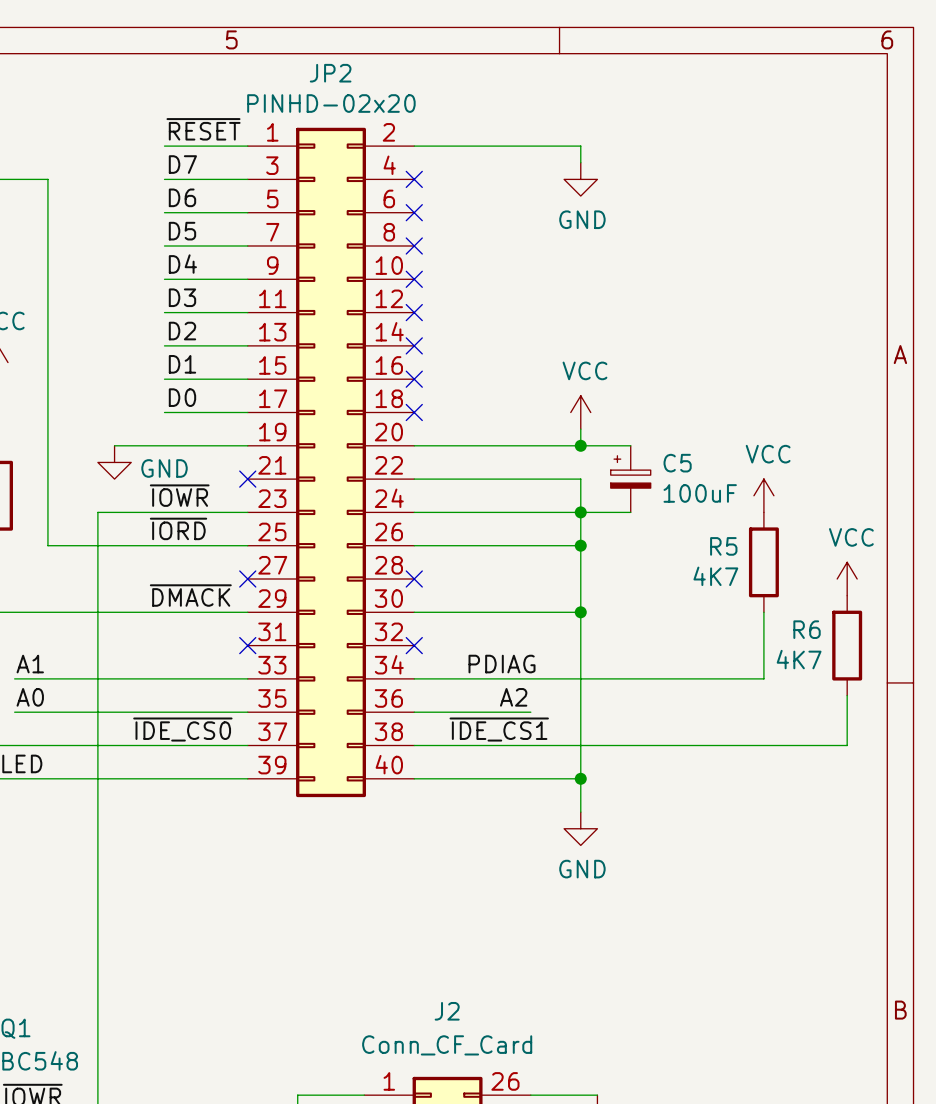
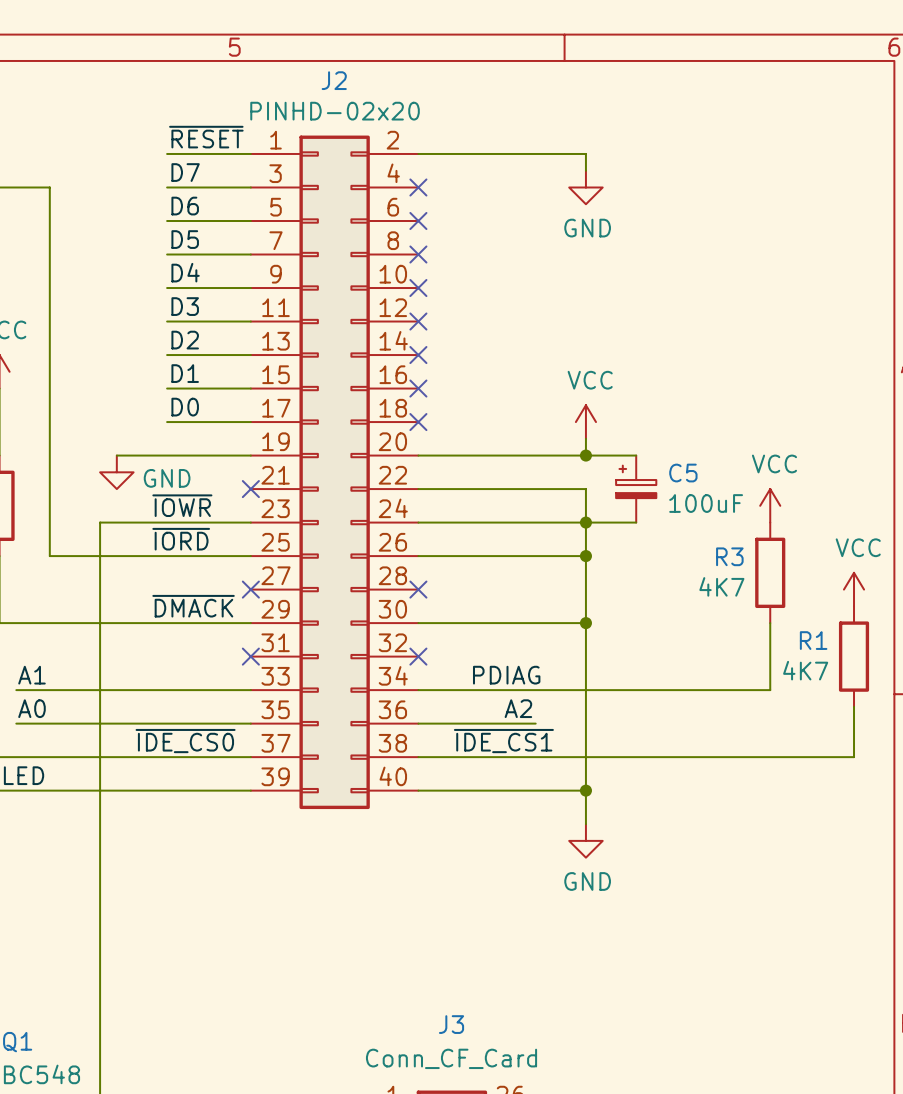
JP2 name: JP2 (330, 73) -> J2 (334, 80)
R5 name: R5 (723, 546) -> R3 (729, 556)
R6 name: R6 (807, 629) -> R1 (813, 640)
J2 name: J2 (447, 1011) -> J3 (451, 1024)

